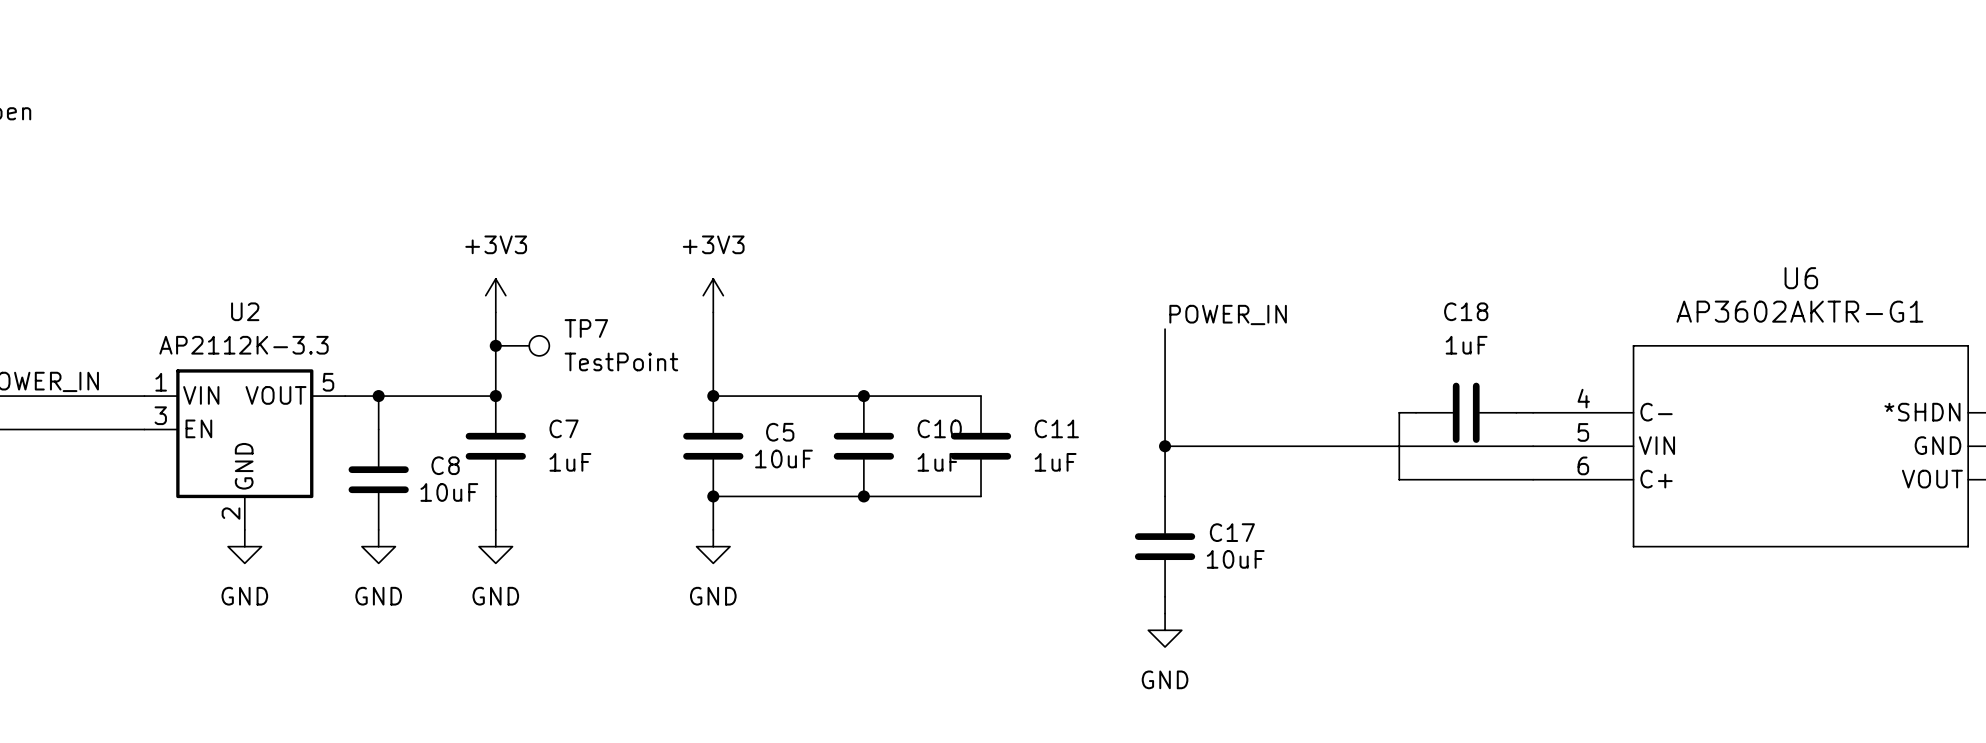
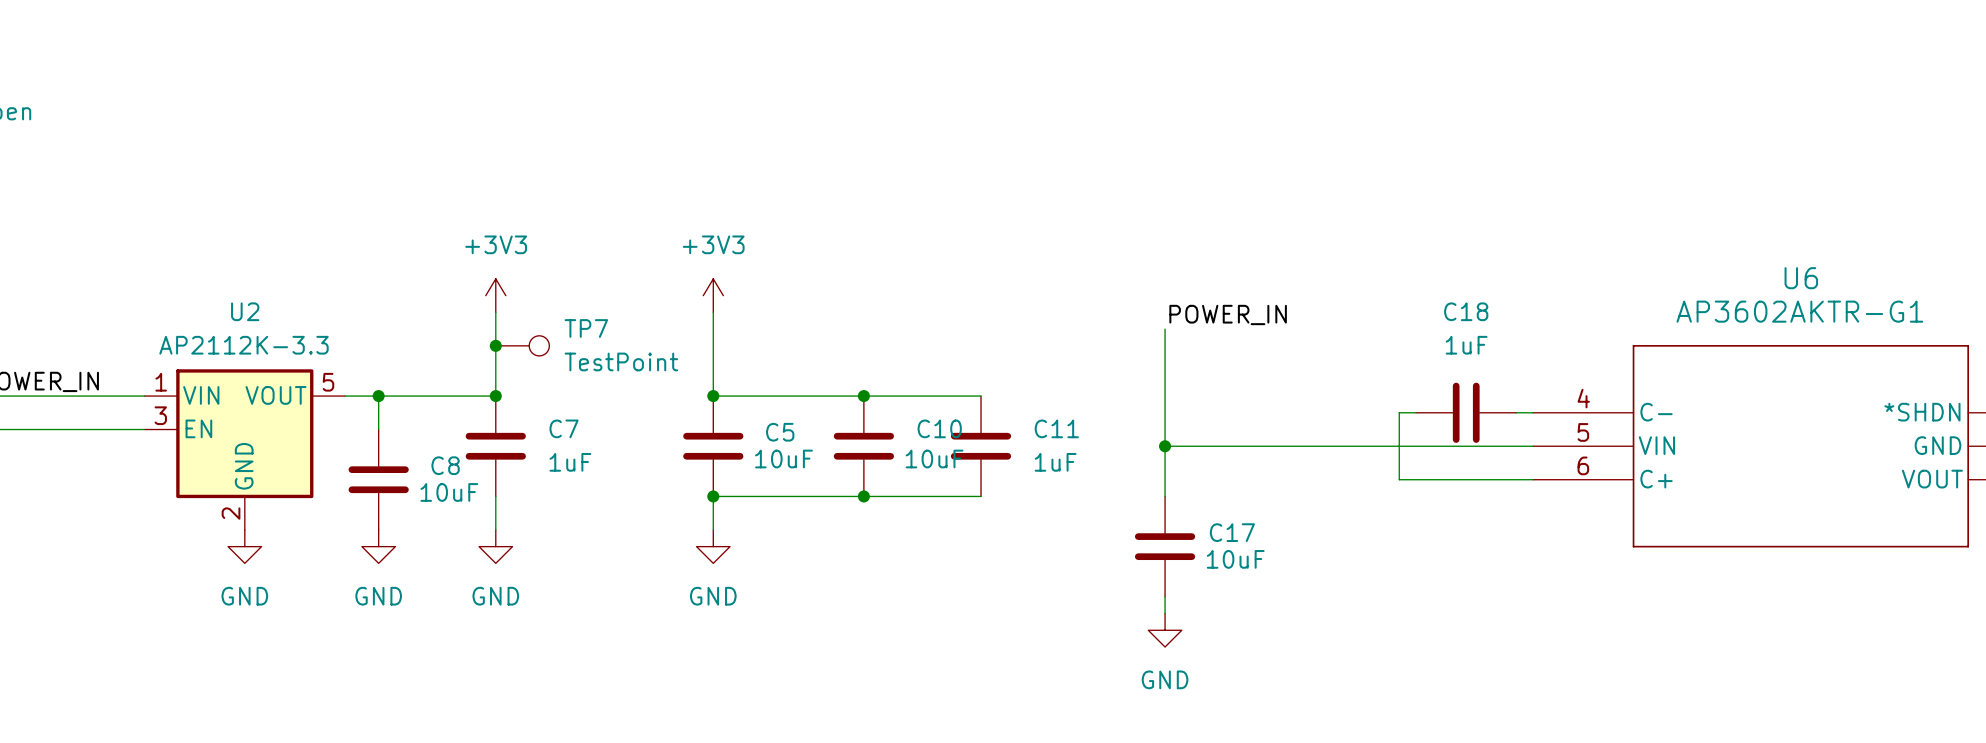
C10 value: 1uF (938, 462) -> 10uF (934, 459)

